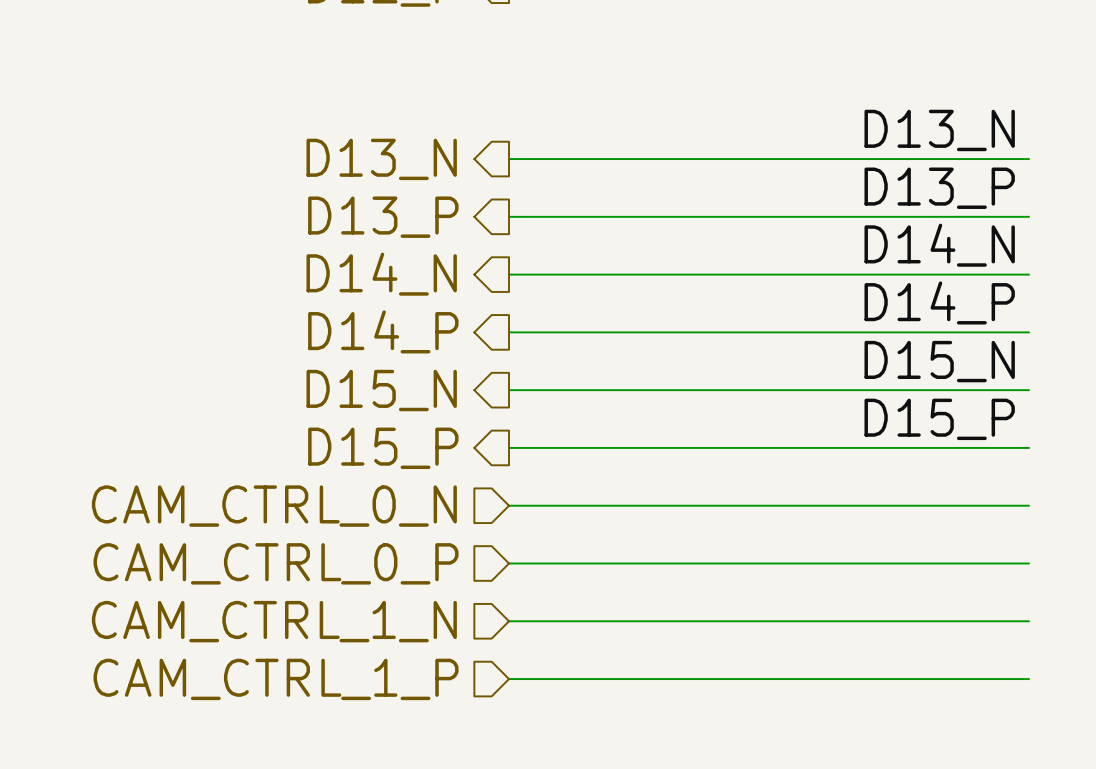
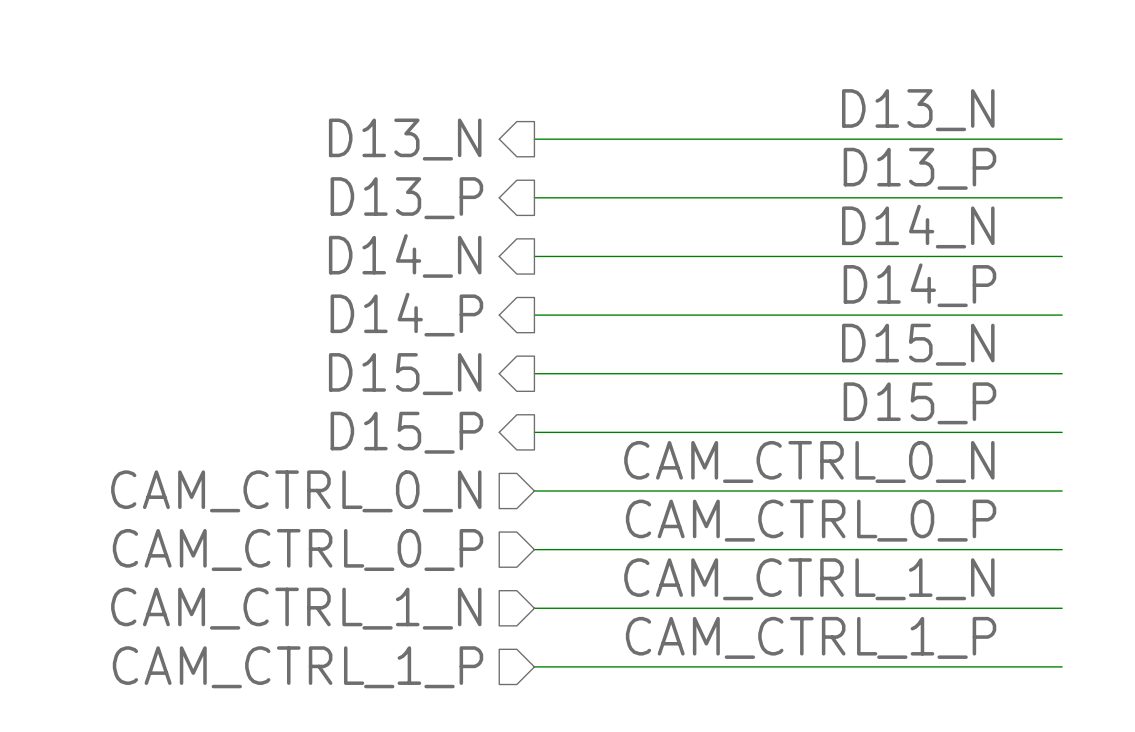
label position: D13_N (939, 130) -> D13_N (918, 110)
label position: D13_P (939, 188) -> D13_P (919, 168)
label position: D14_N (939, 245) -> D14_N (918, 226)
label position: D14_P (939, 302) -> D14_P (919, 285)
label position: D15_N (939, 361) -> D15_N (918, 344)
label position: D15_P (939, 419) -> D15_P (919, 403)
label: none -> CAM_CTRL_0_N (809, 461)
label: none -> CAM_CTRL_0_P (811, 520)
label: none -> CAM_CTRL_1_N (809, 579)
label: none -> CAM_CTRL_1_P (811, 637)

